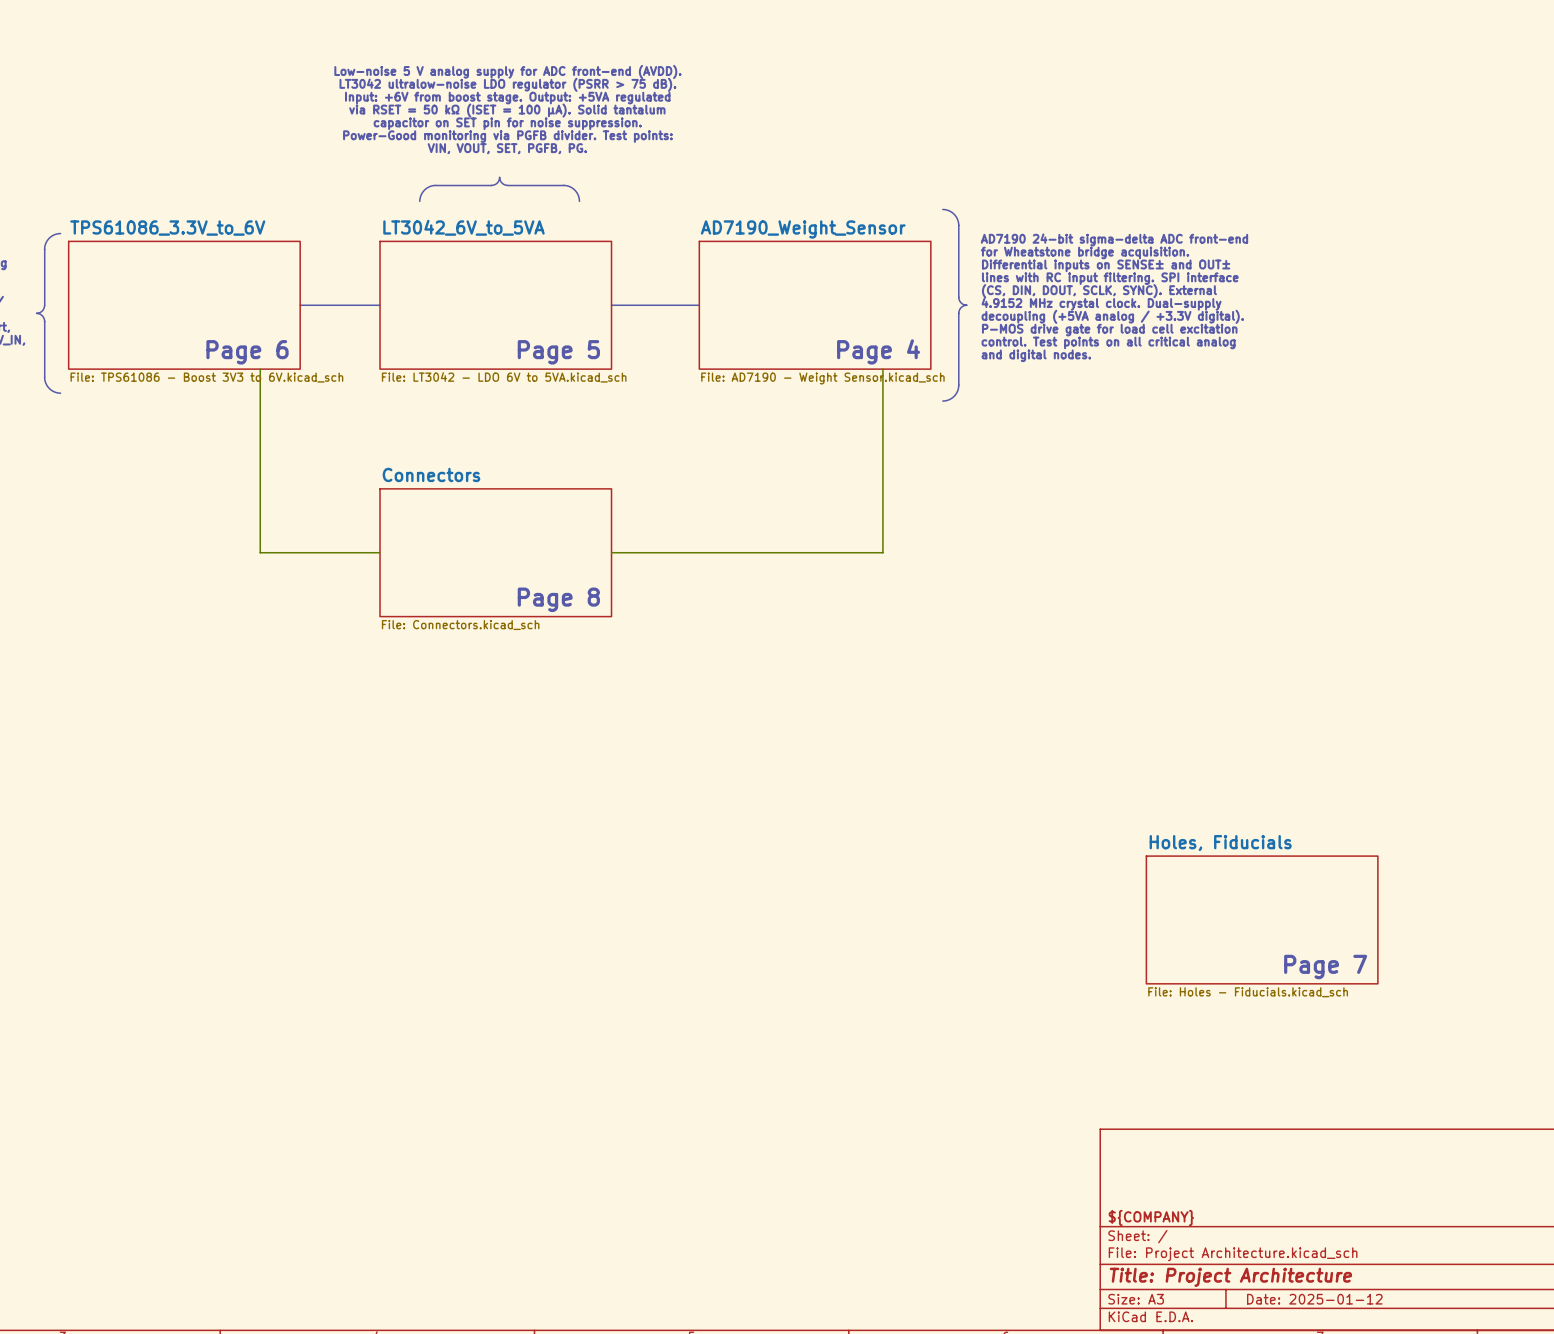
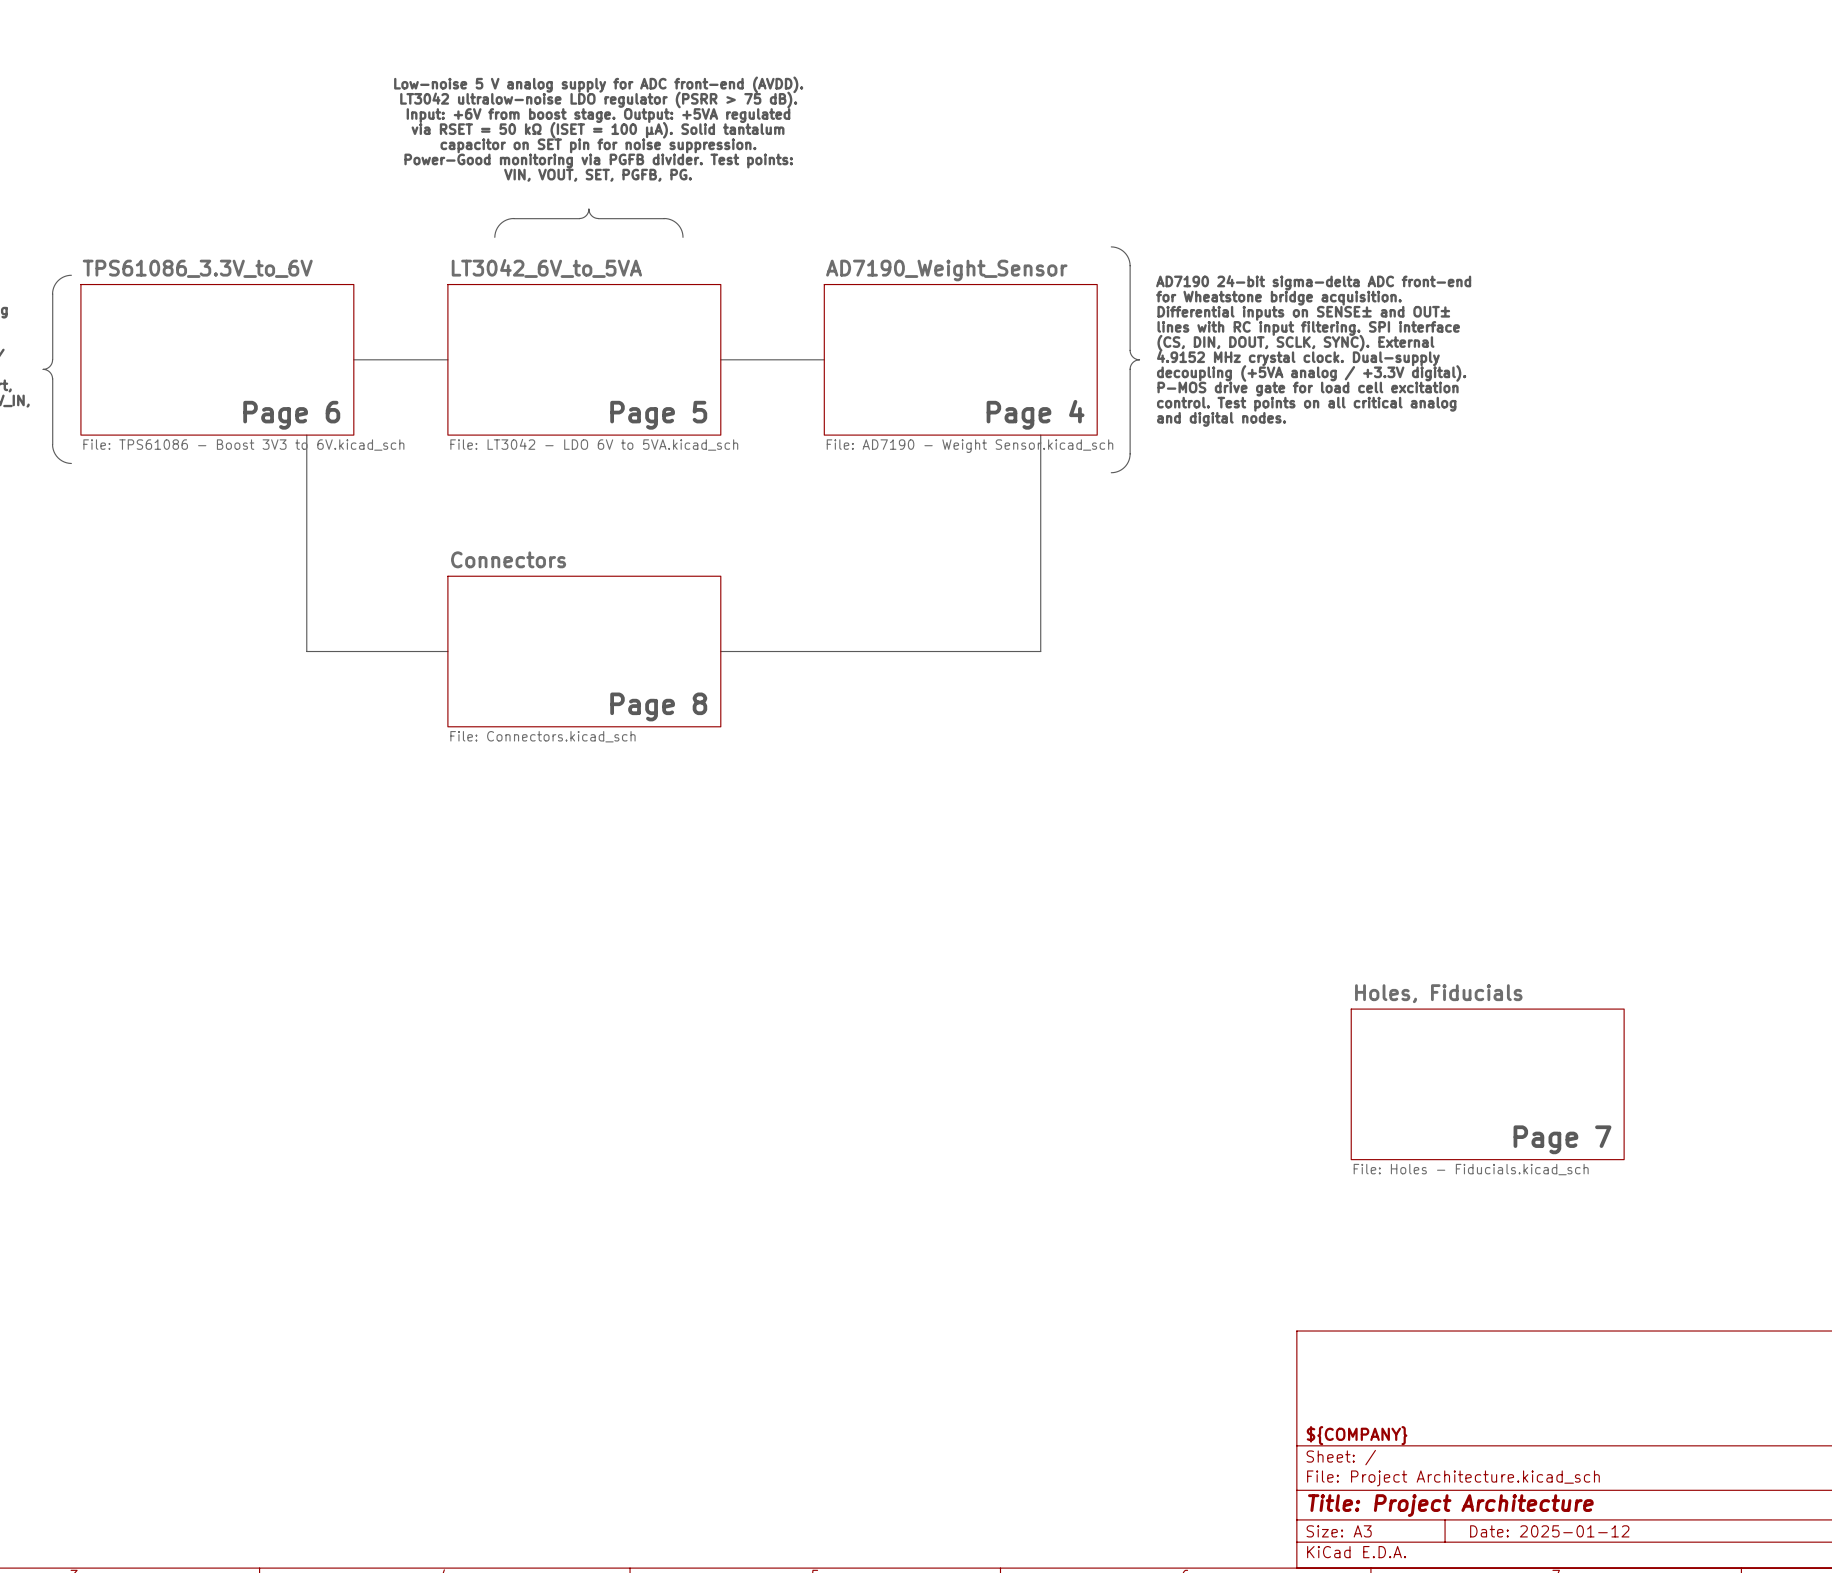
line: none -> (306, 435) (306, 651) (447, 651)
line: none -> (1040, 435) (1040, 651) (720, 651)

